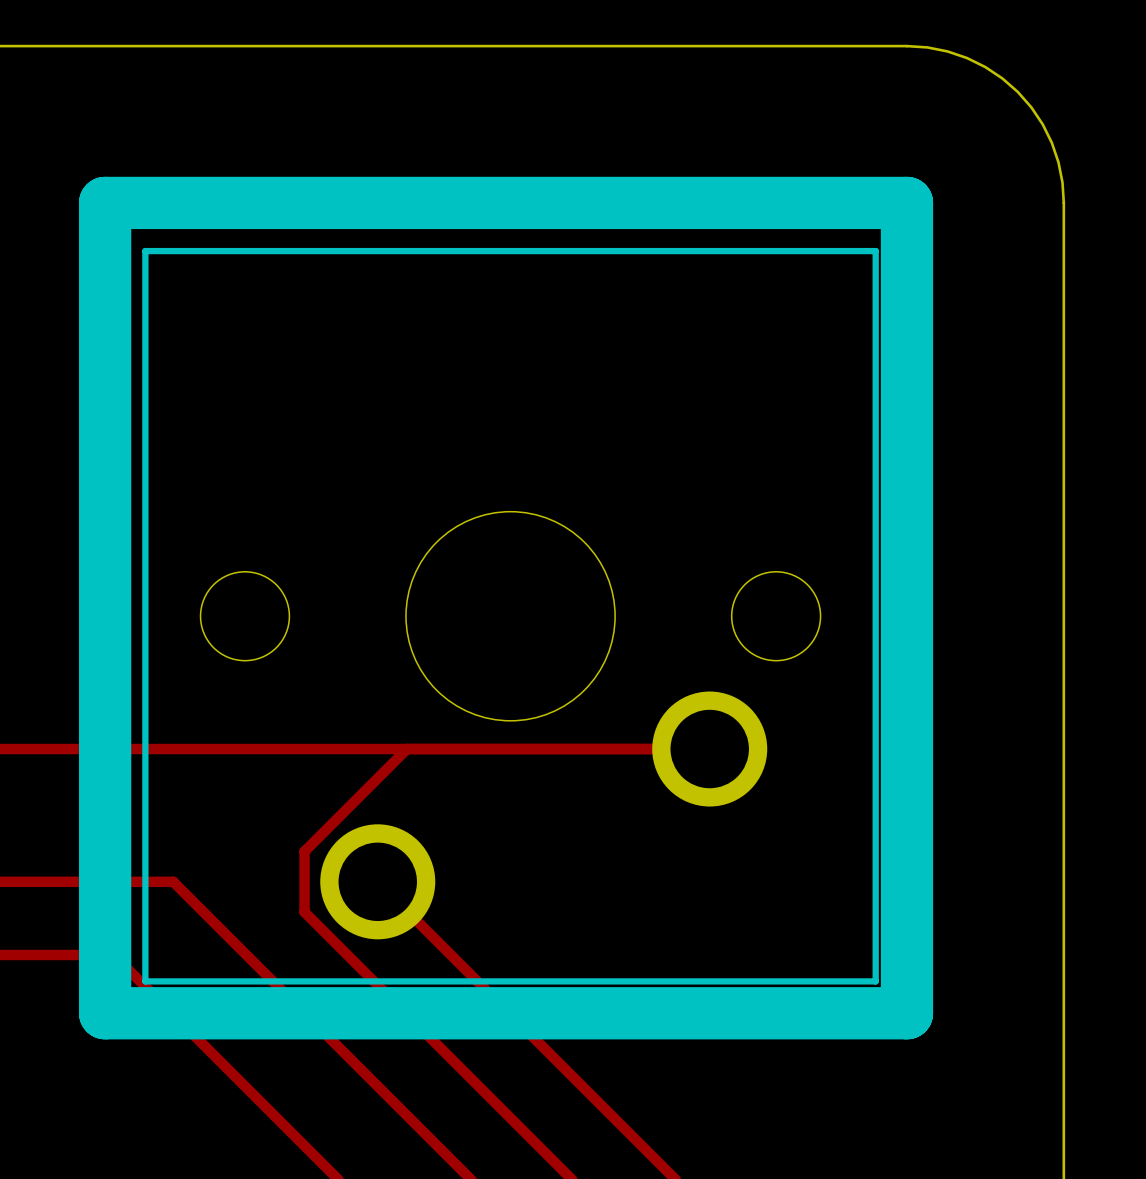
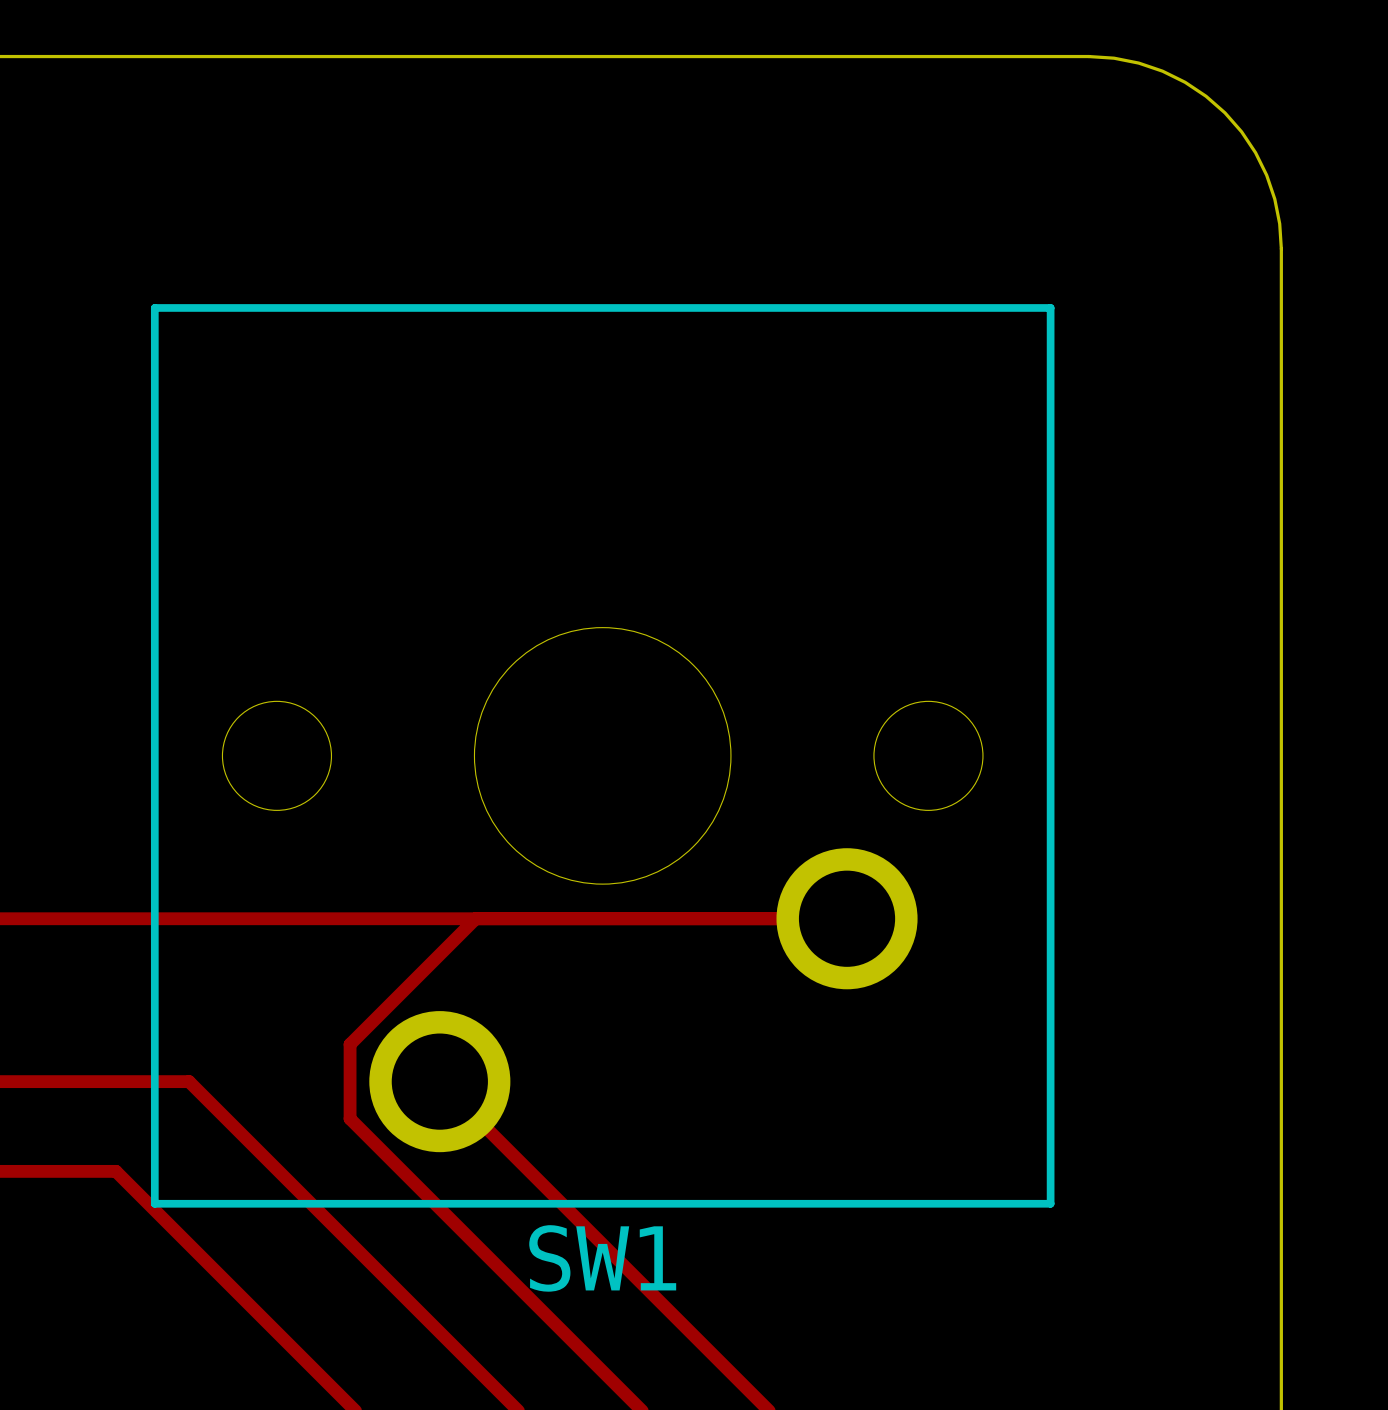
line: (105, 202) (906, 202) (906, 1013) (105, 1013) (105, 202) -> none
SW1 name: none -> SW1 (602, 1258)

